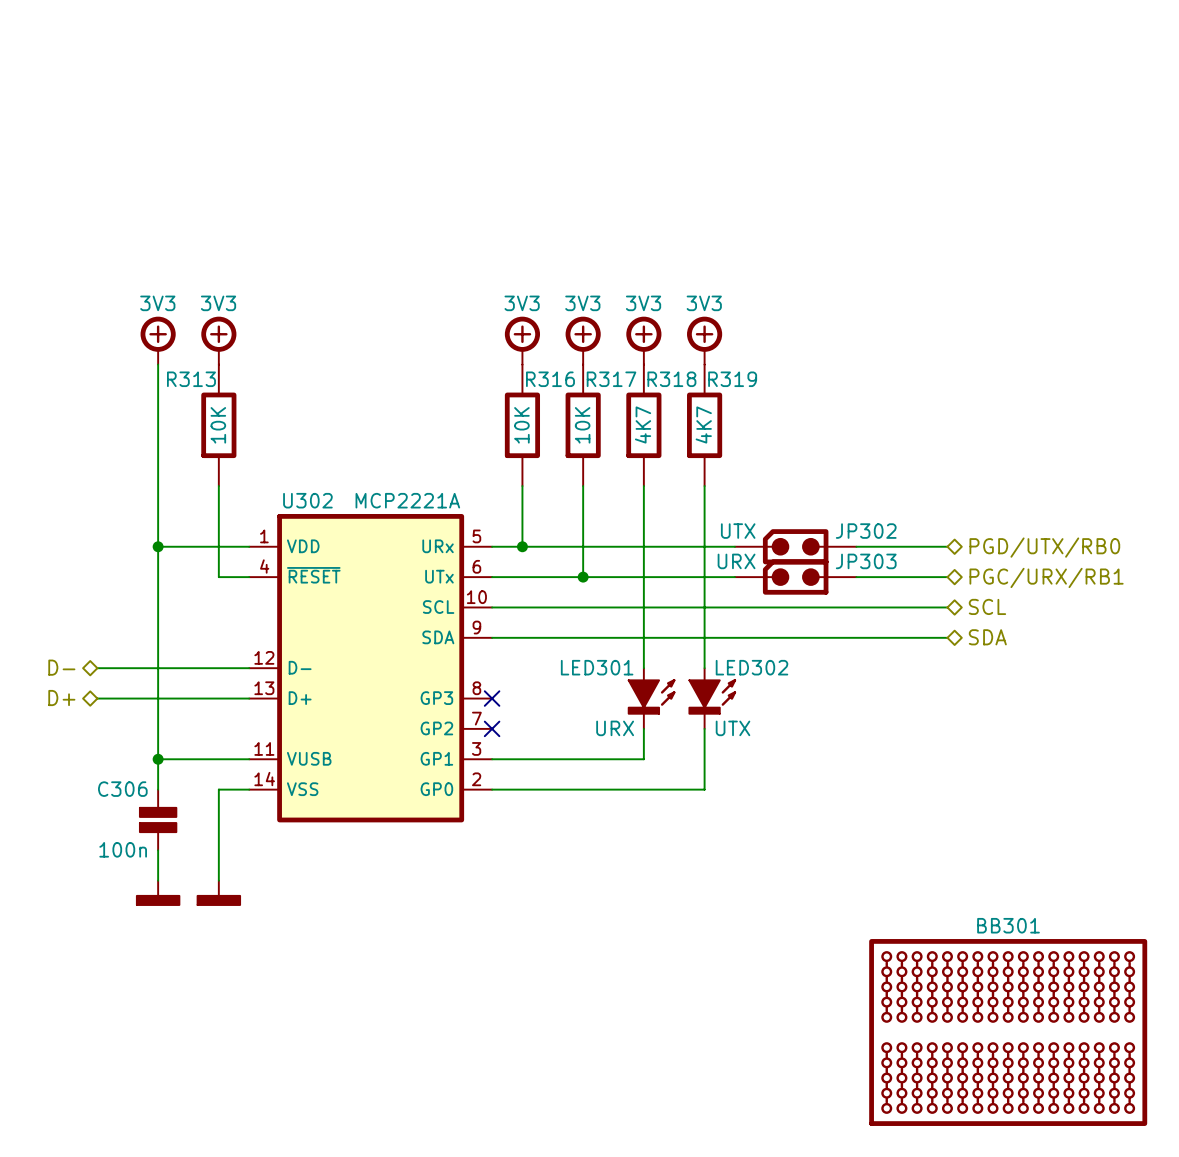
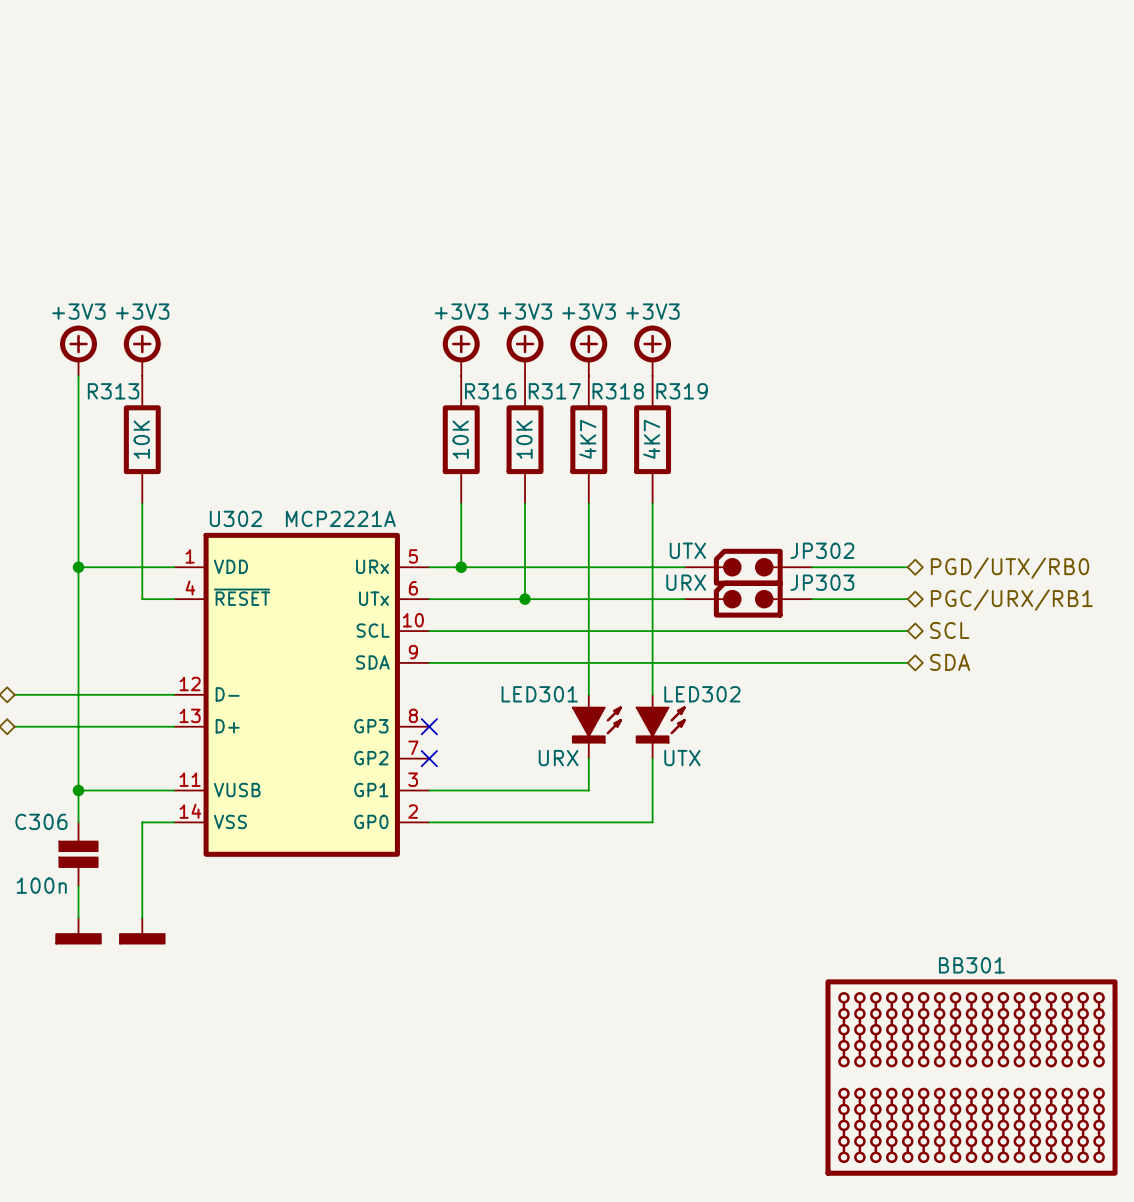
power symbol text: 3V3 (157, 303) -> +3V3 (78, 311)
power symbol text: 3V3 (218, 303) -> +3V3 (142, 311)
power symbol text: 3V3 (522, 303) -> +3V3 (461, 311)
power symbol text: 3V3 (582, 303) -> +3V3 (525, 311)
power symbol text: 3V3 (643, 303) -> +3V3 (589, 311)
power symbol text: 3V3 (704, 303) -> +3V3 (652, 311)

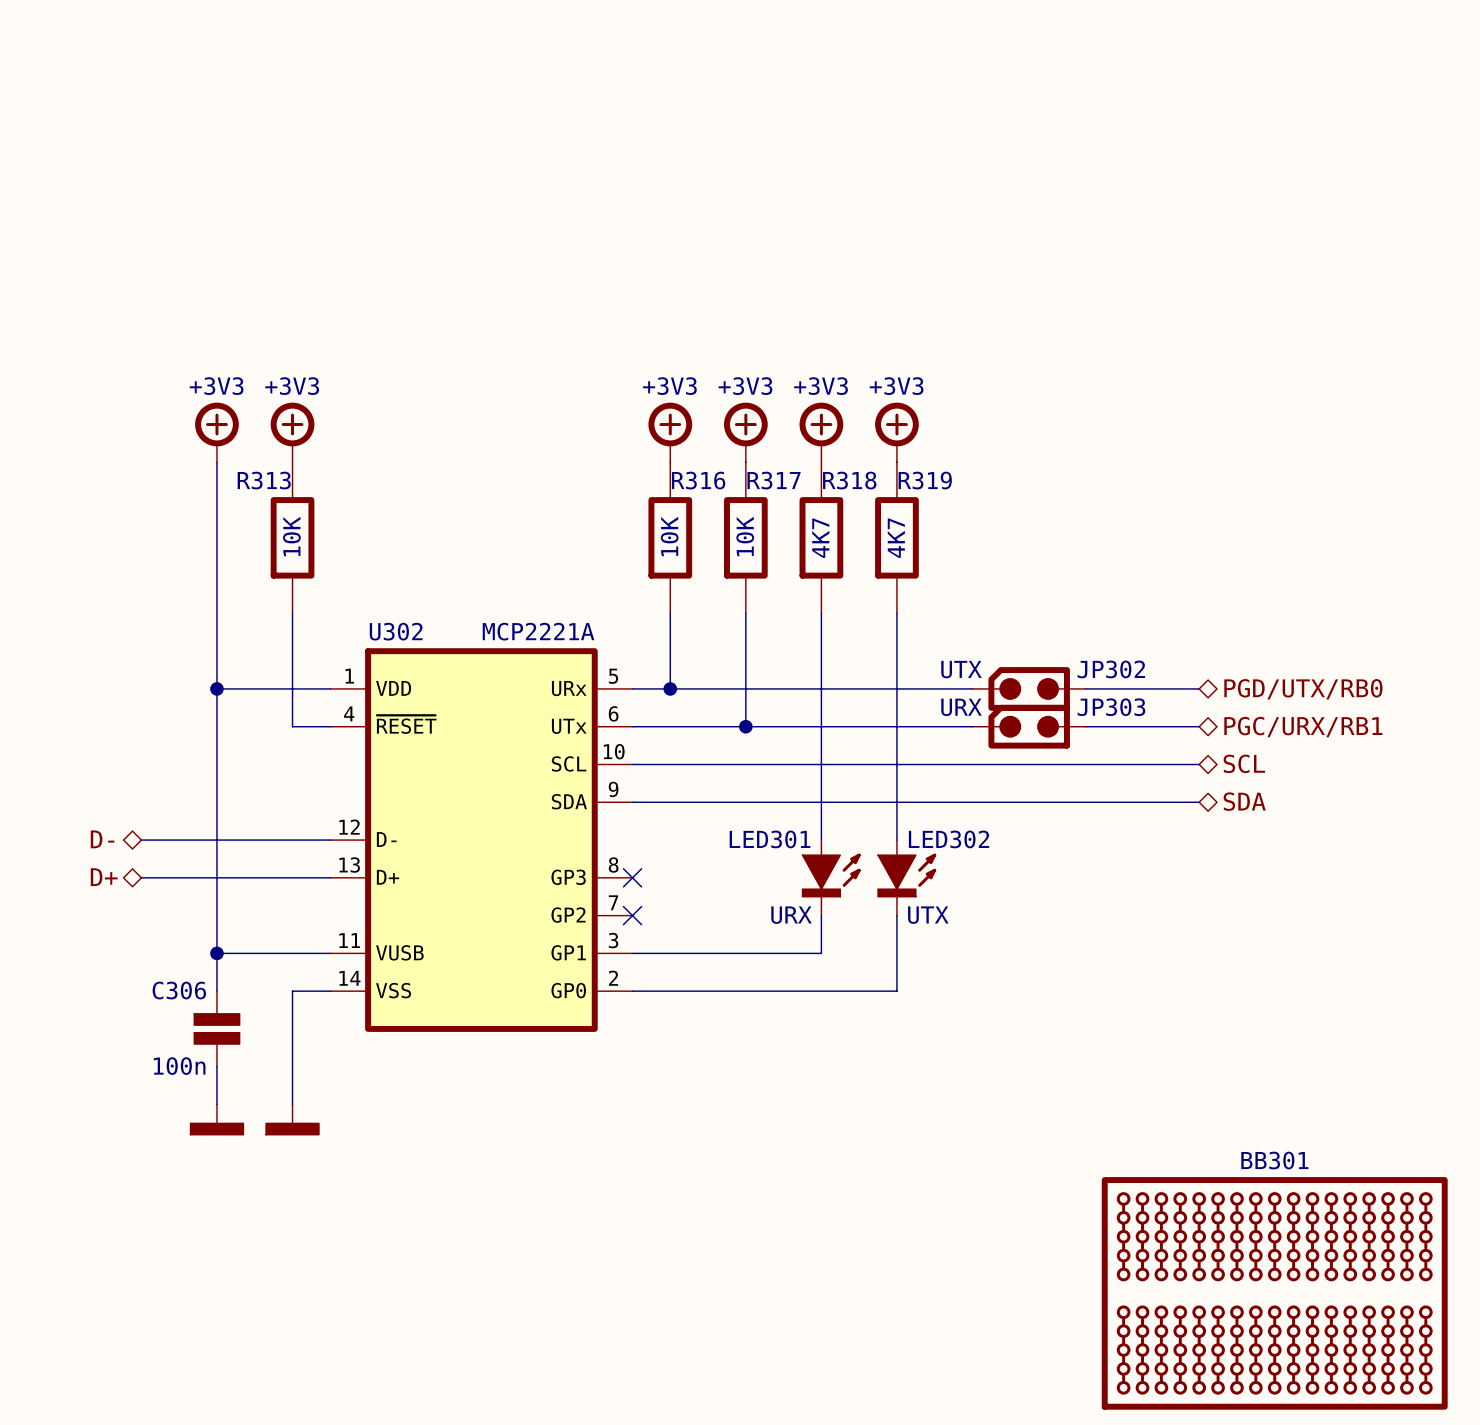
JP302 symbol: [684, 548, 813, 586] -> [972, 667, 1086, 711]
JP303 symbol: [684, 580, 813, 618] -> [972, 704, 1086, 749]

